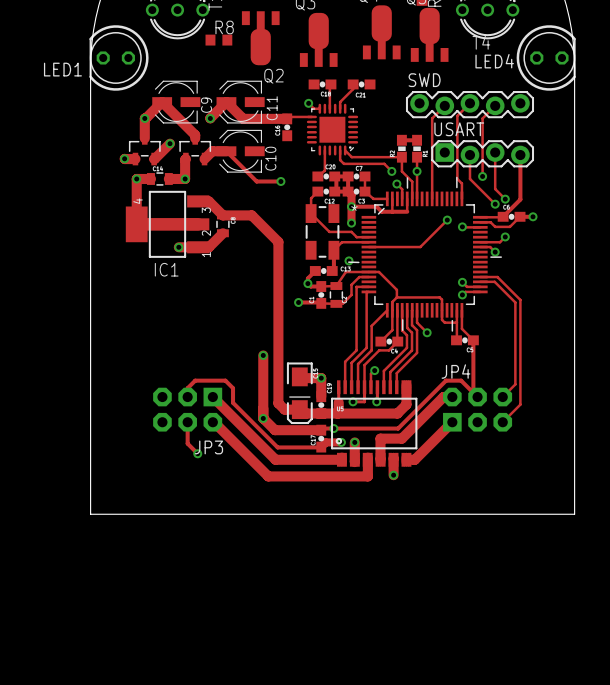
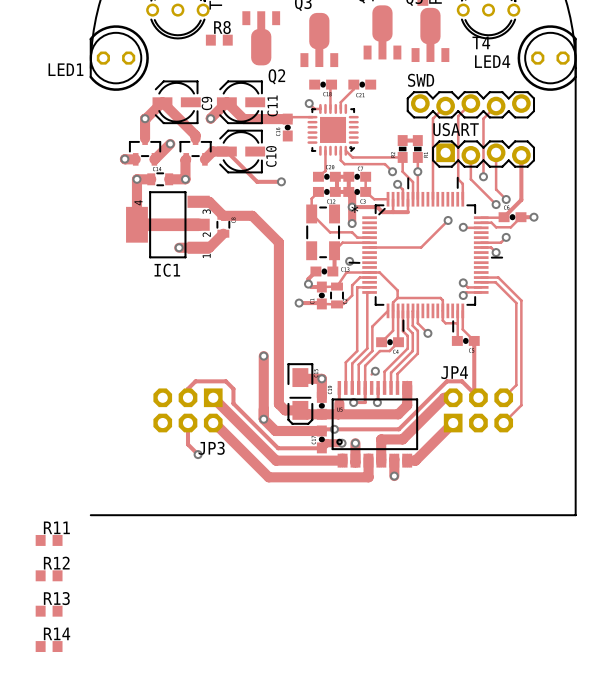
board edge: (90, 68) (90, 514) -> none
track: (370, 373) (370, 387) -> none
R11: none -> (49, 540)
R12: none -> (49, 575)
R13: none -> (49, 611)
R14: none -> (49, 646)

